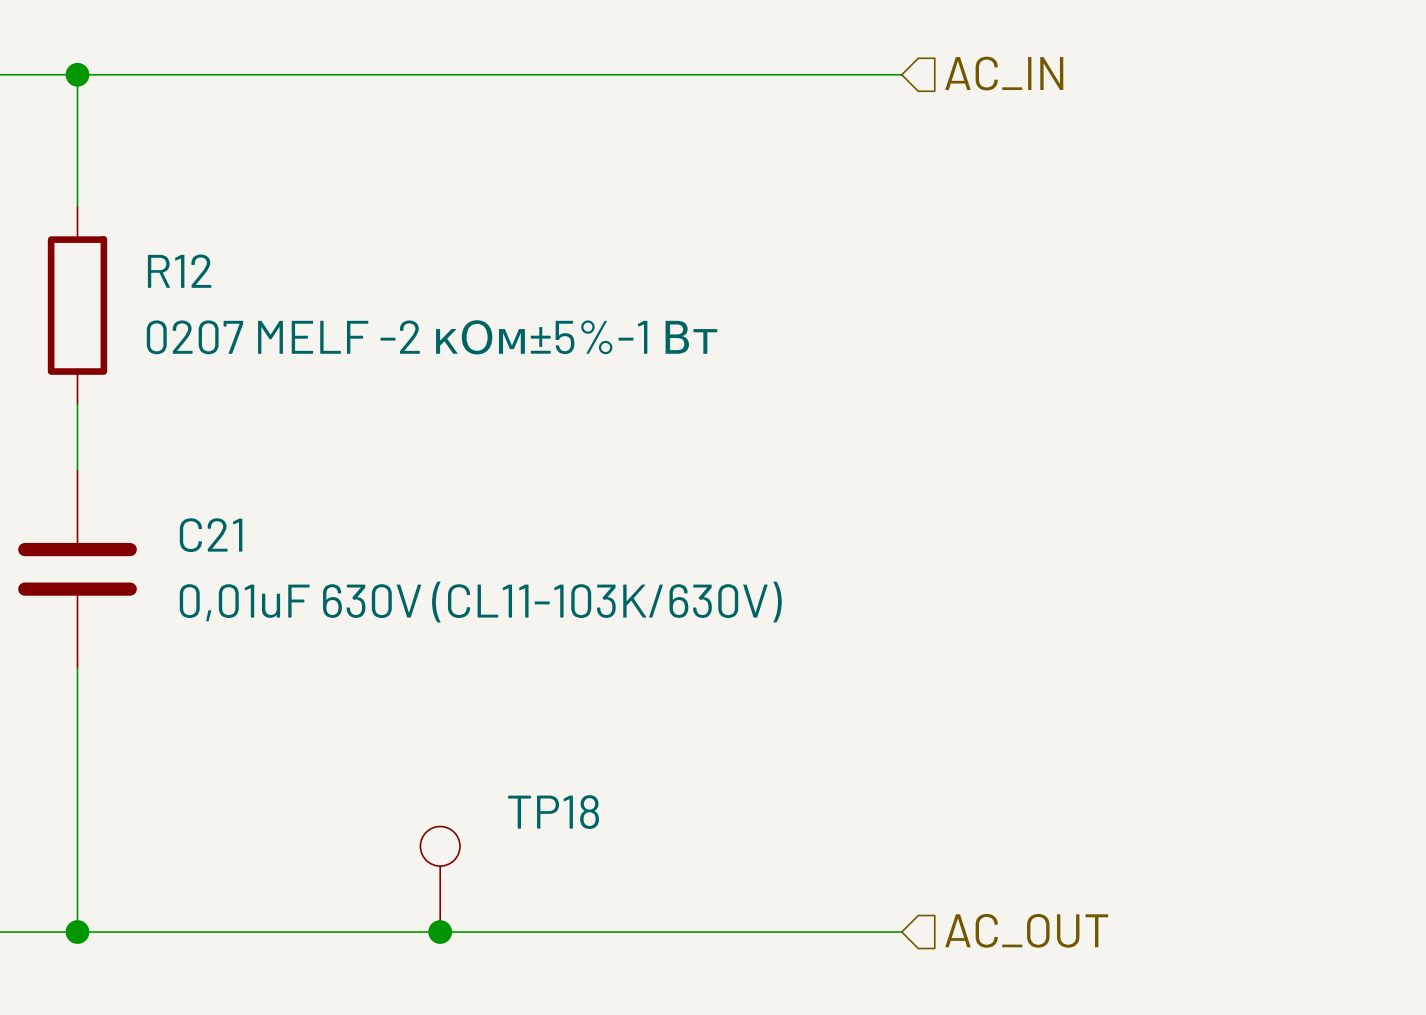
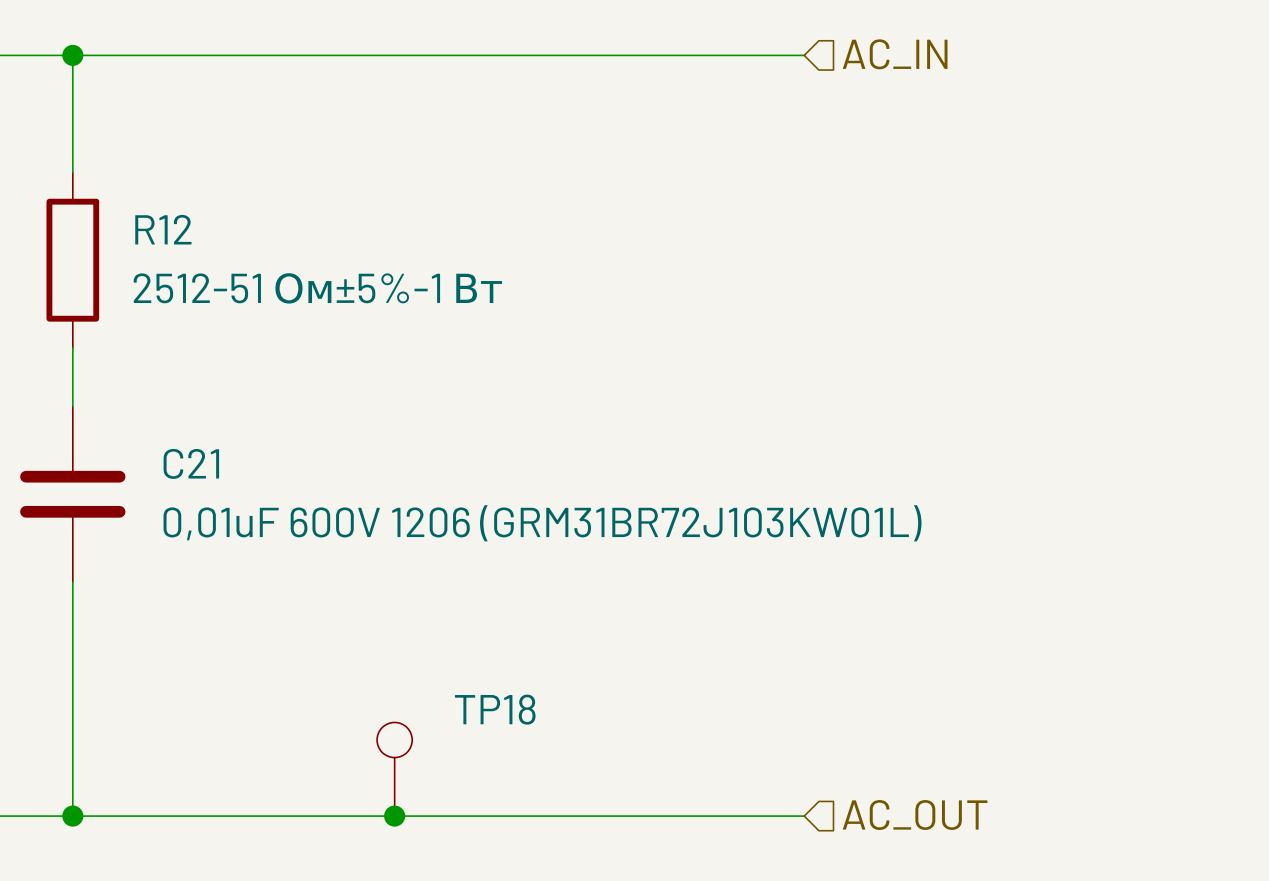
R12 value: 0207 MELF -2 кОм±5%-1 Вт (432, 337) -> 2512-51 Ом±5%-1 Вт (317, 288)
C21 value: 0,01uF 630V (CL11-103K/630V) (480, 602) -> 0,01uF 600V 1206 (GRM31BR72J103KW01L) (542, 523)

